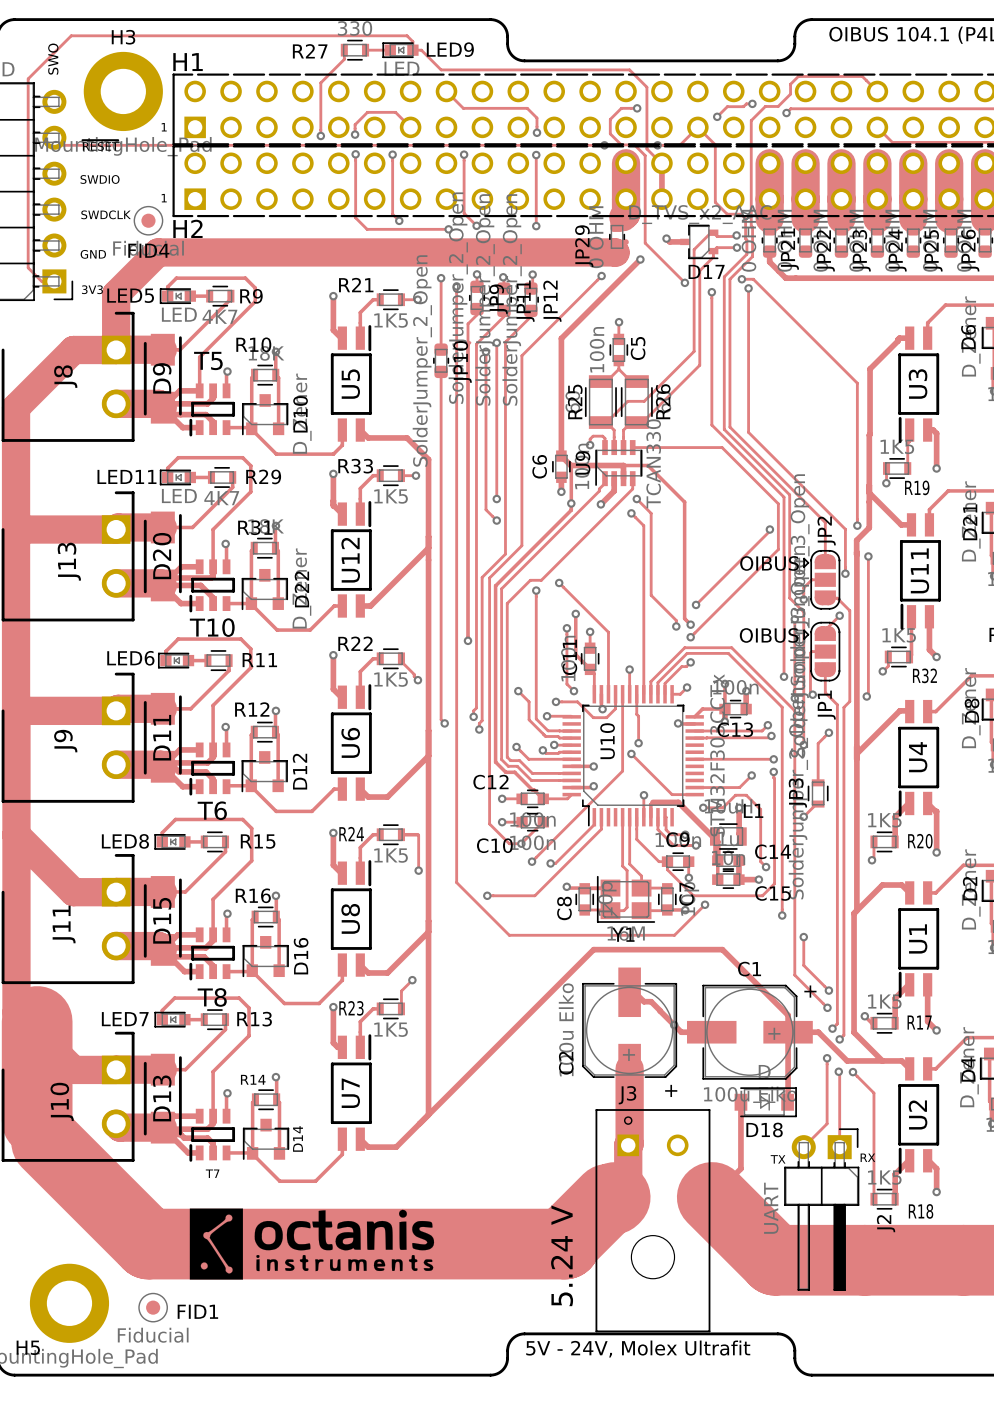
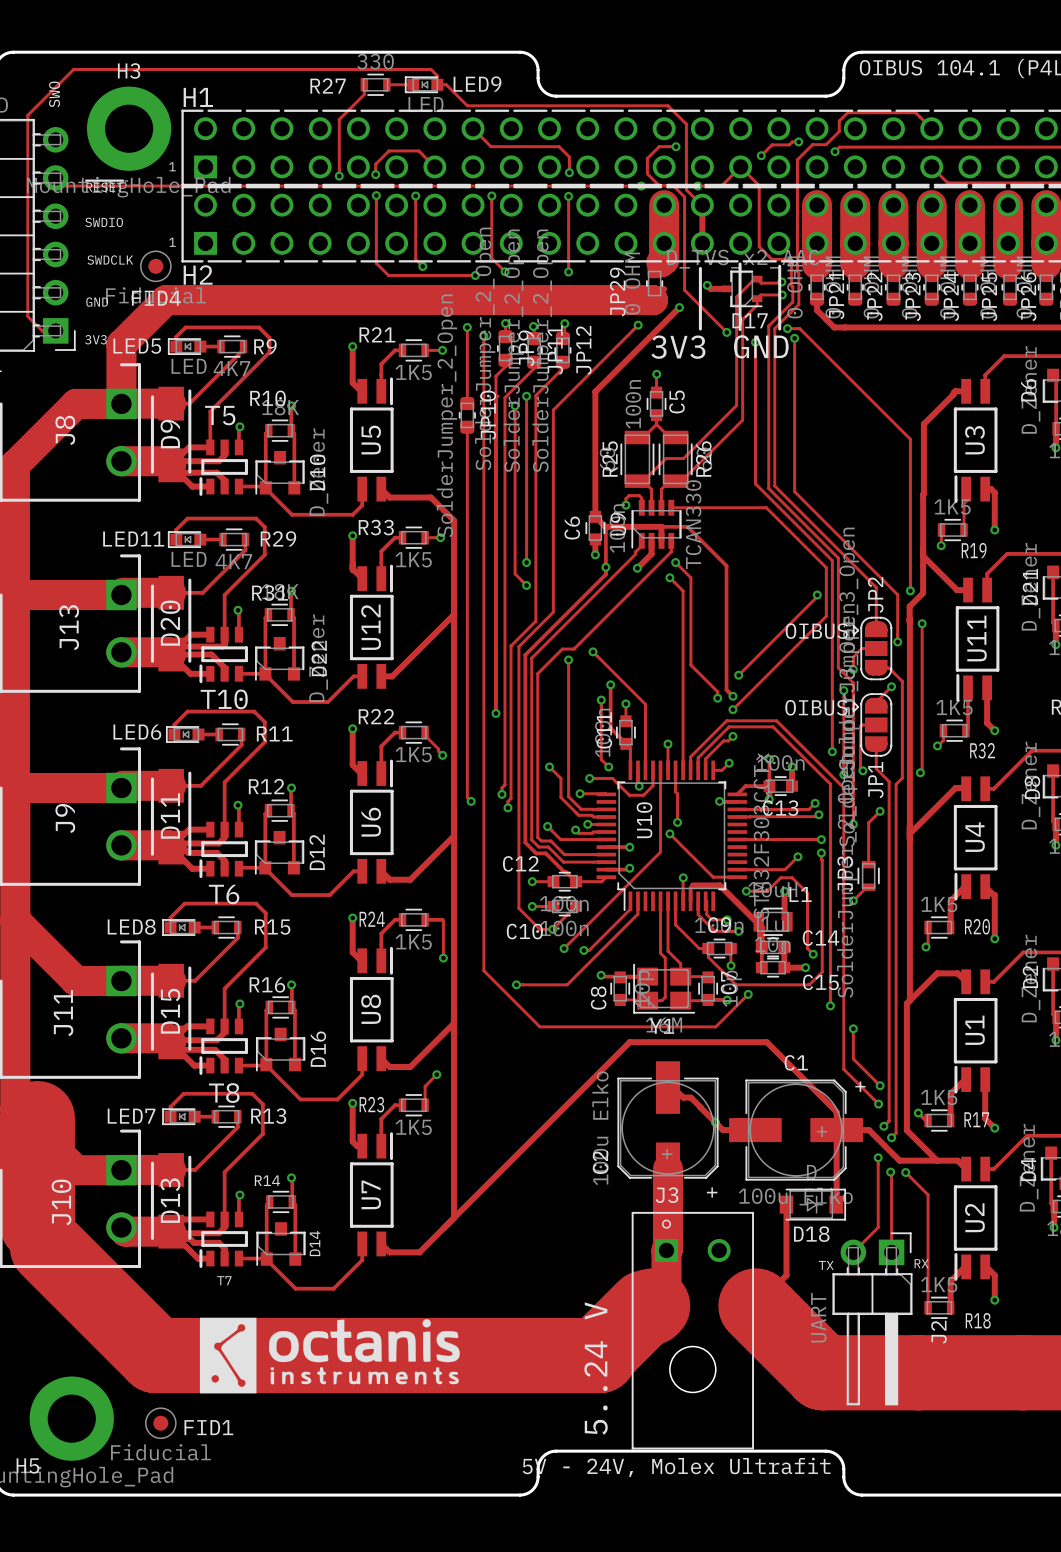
line: none -> (740, 263) (740, 329)
line: none -> (779, 266) (779, 329)
line: none -> (700, 268) (700, 329)
text: none -> 3V3 (678, 347)
text: none -> GND (761, 346)

